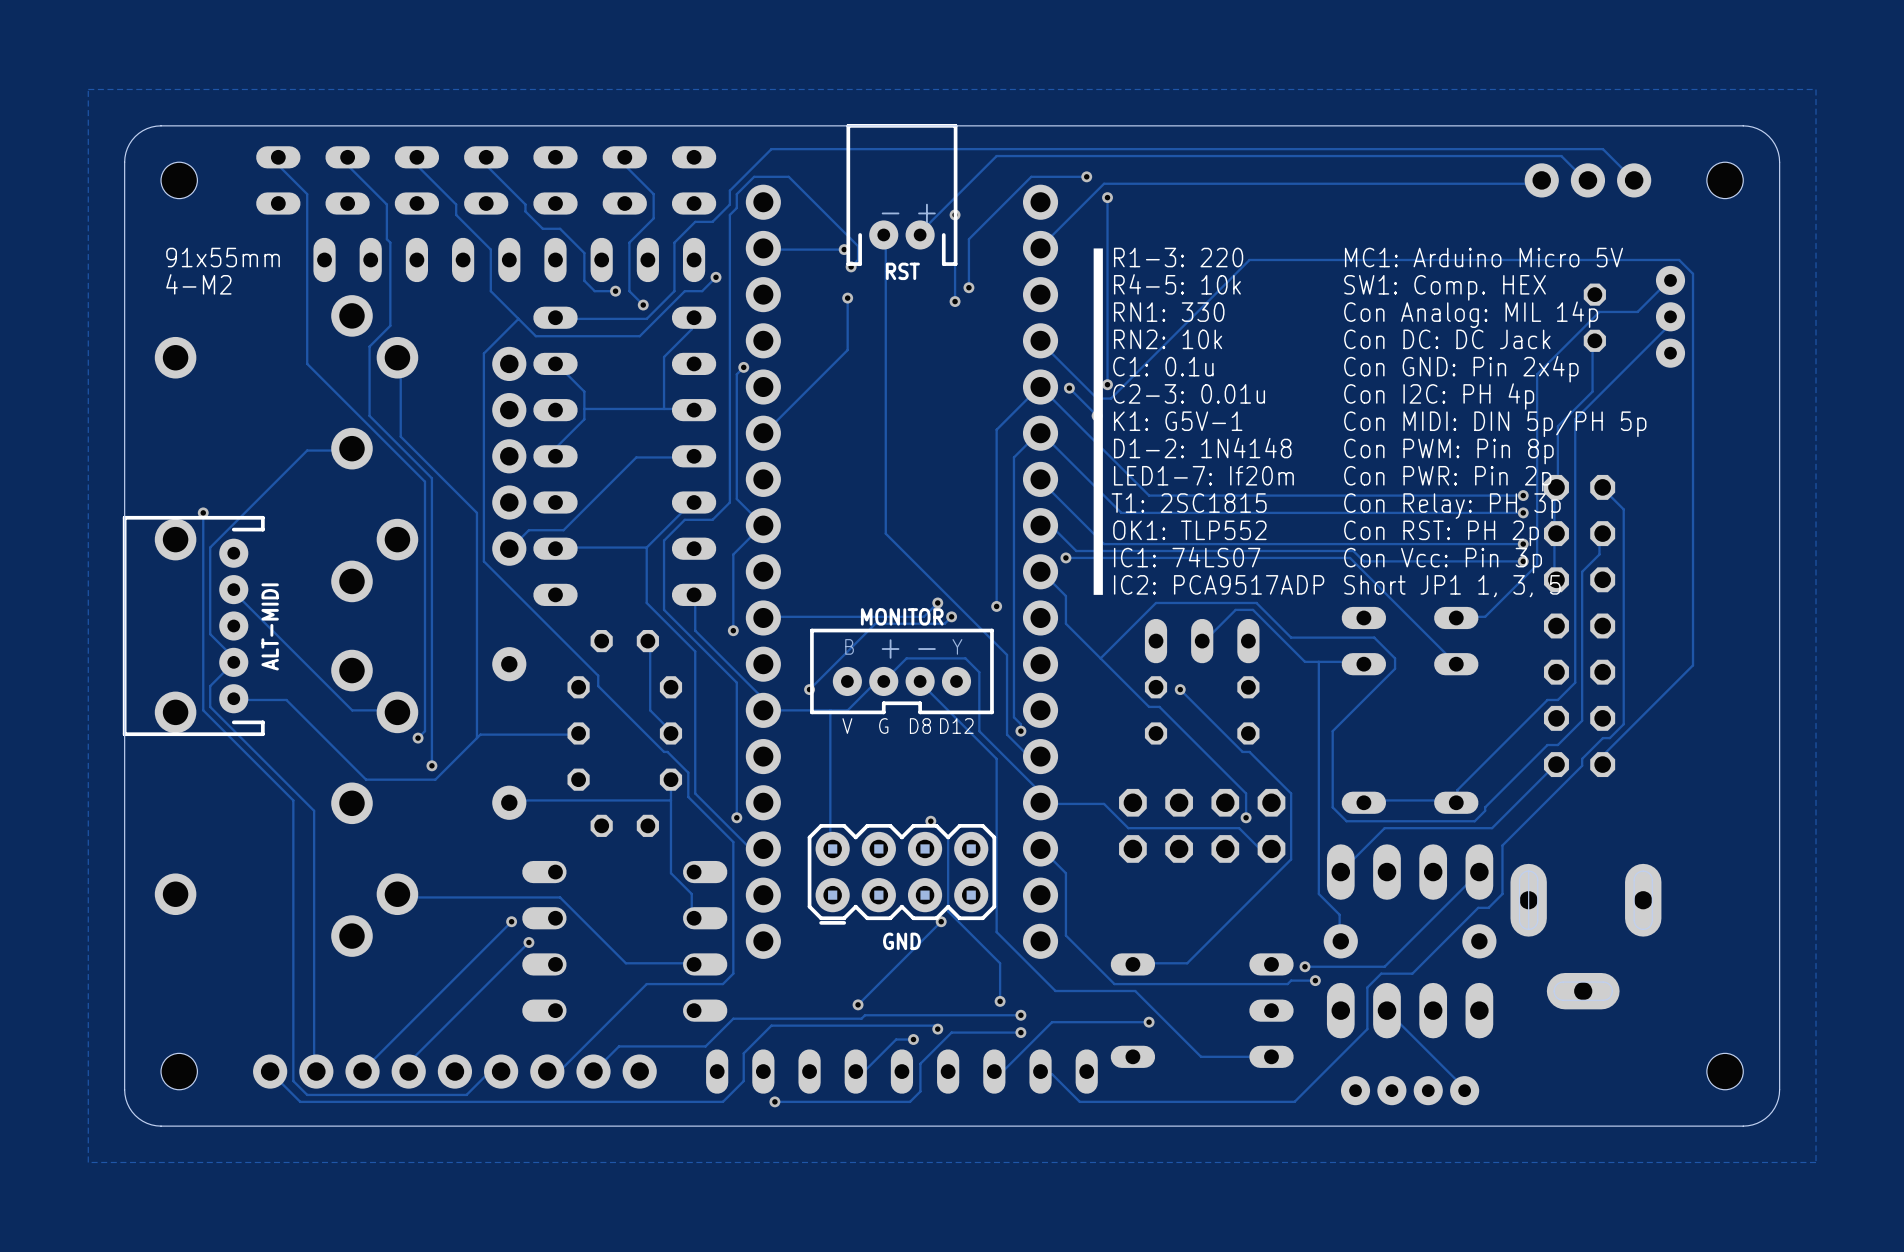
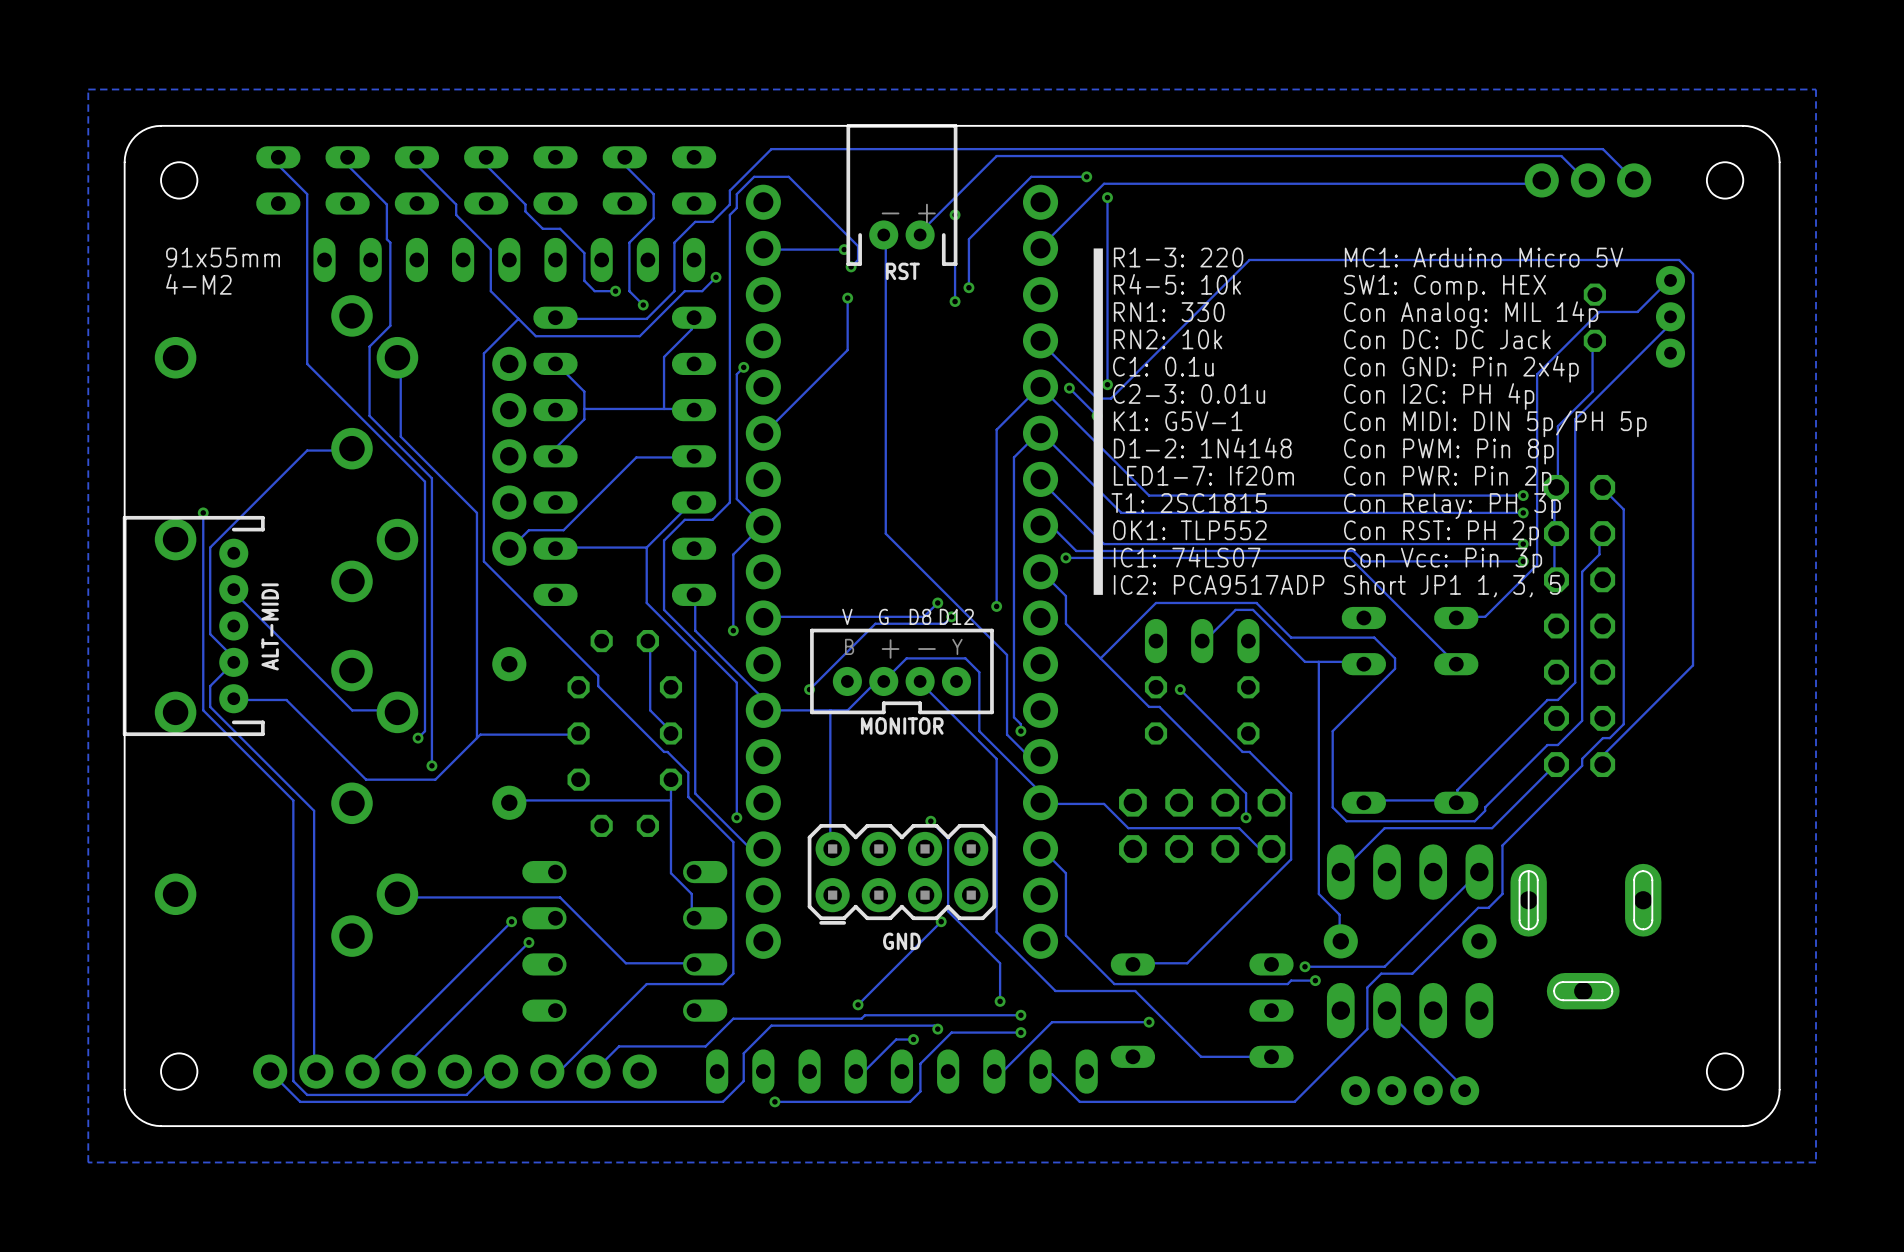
MONITOR name position: MONITOR (902, 616) -> MONITOR (902, 726)
text position: V (847, 726) -> V (847, 616)
text position: G (883, 726) -> G (883, 616)
text position: D8 (920, 726) -> D8 (920, 616)
text position: D12 (956, 726) -> D12 (956, 616)

